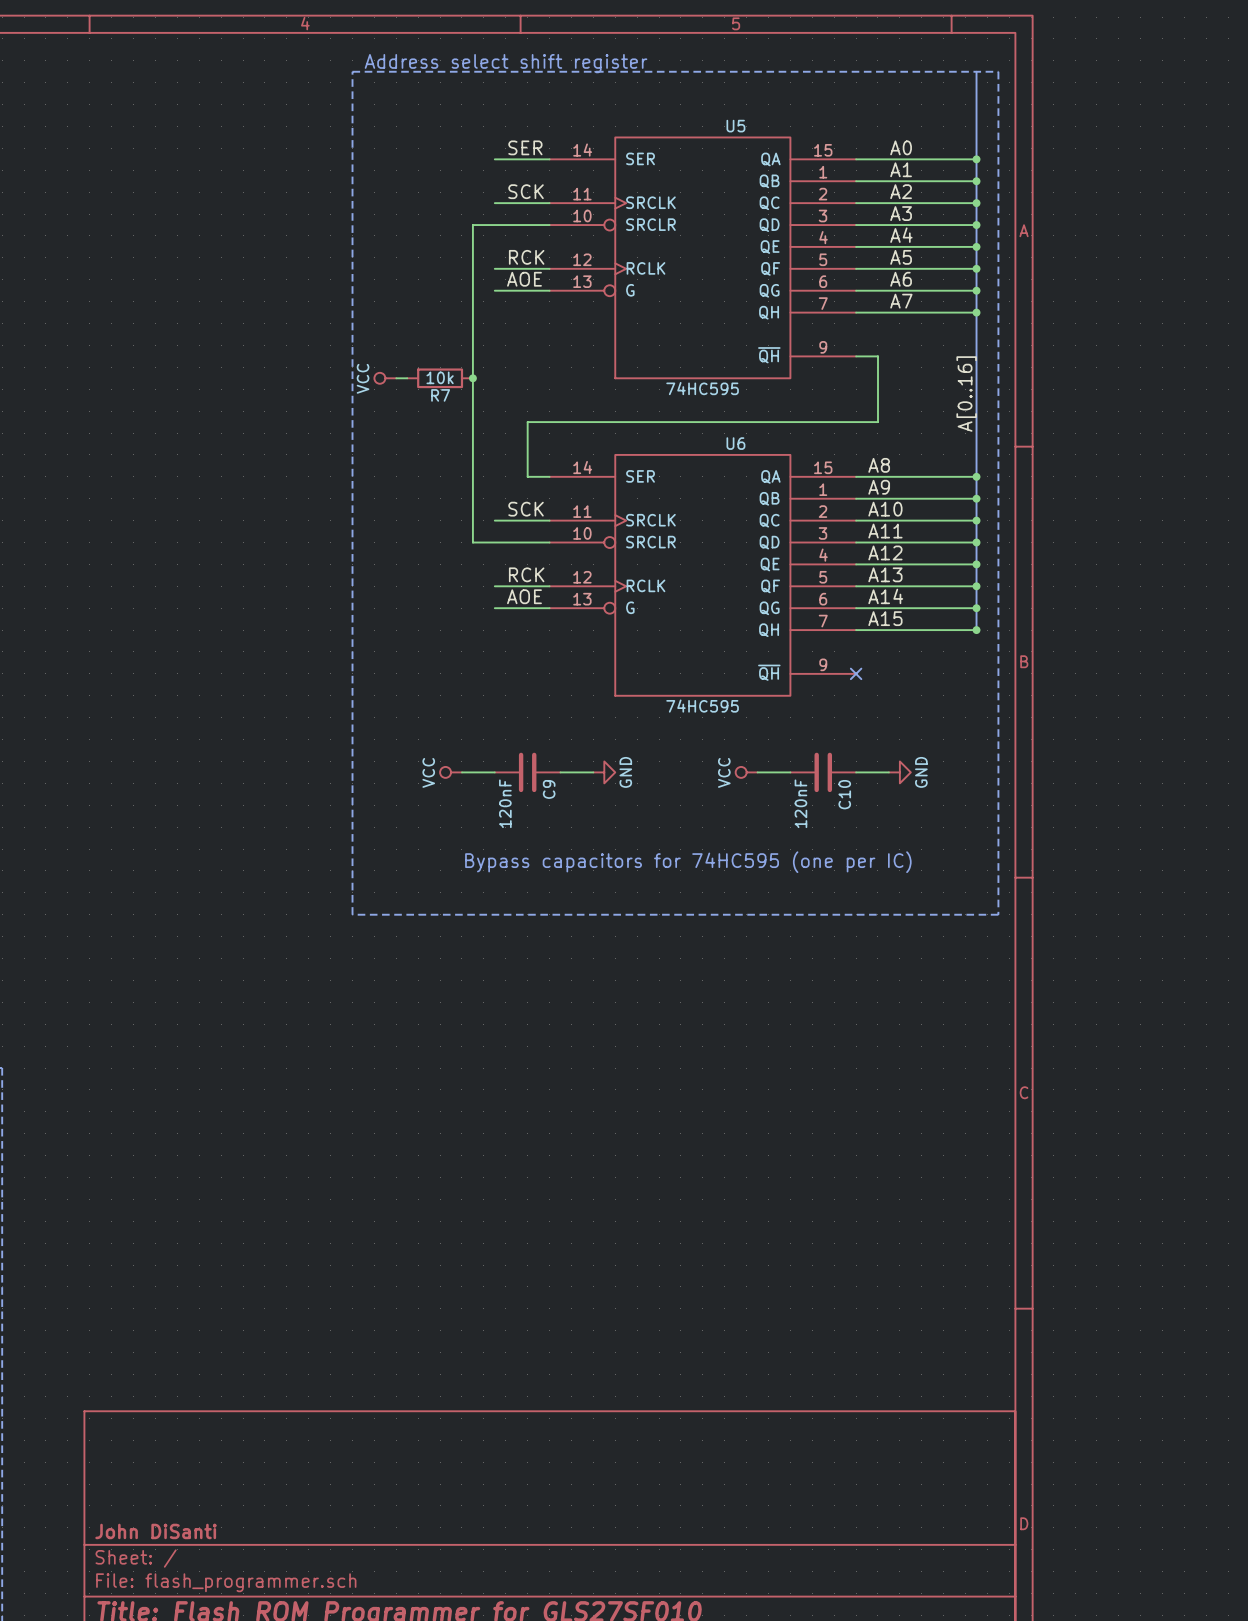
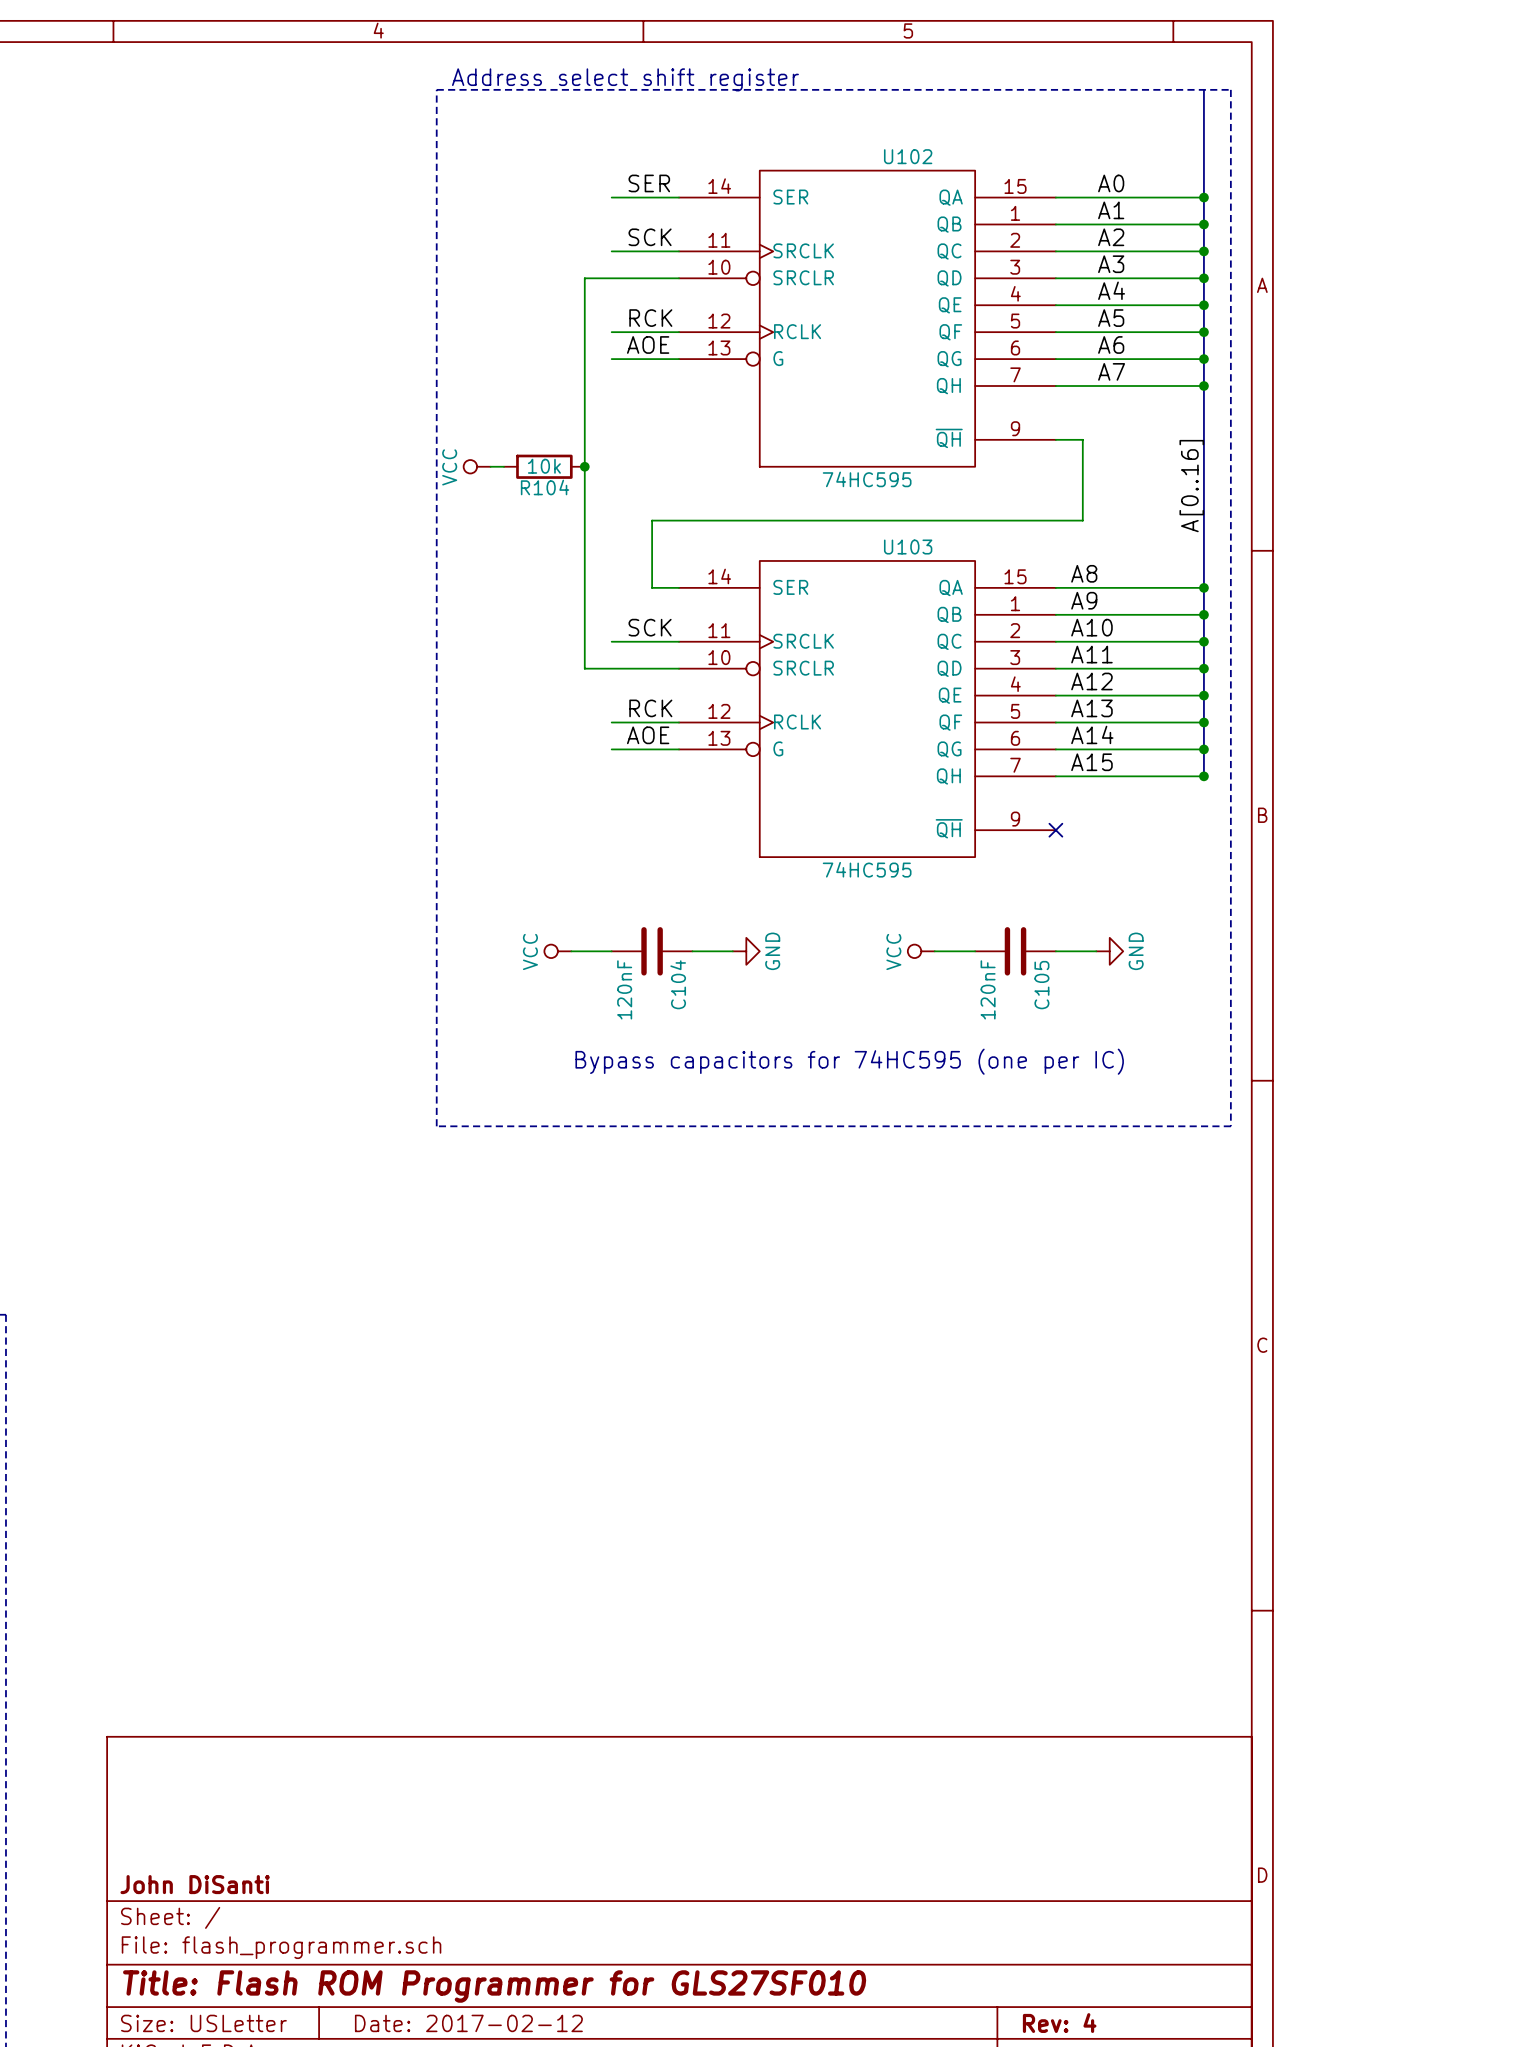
U5 name: U5 (735, 126) -> U102 (908, 156)
R7 name: R7 (440, 395) -> R104 (545, 487)
U6 name: U6 (735, 443) -> U103 (908, 547)
C9 name: C9 (549, 789) -> C104 (678, 984)
C10 name: C10 (844, 794) -> C105 (1041, 985)

